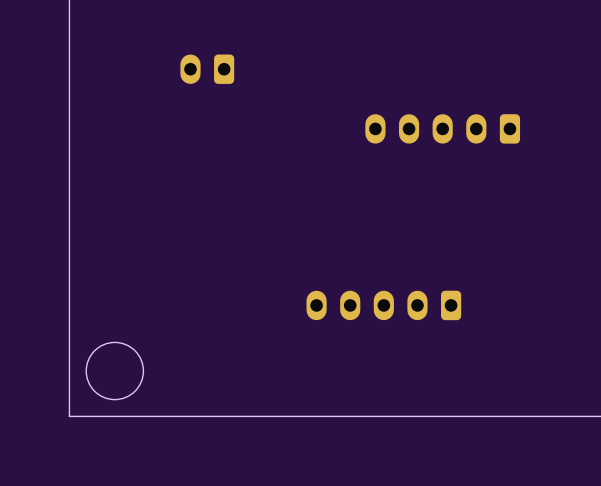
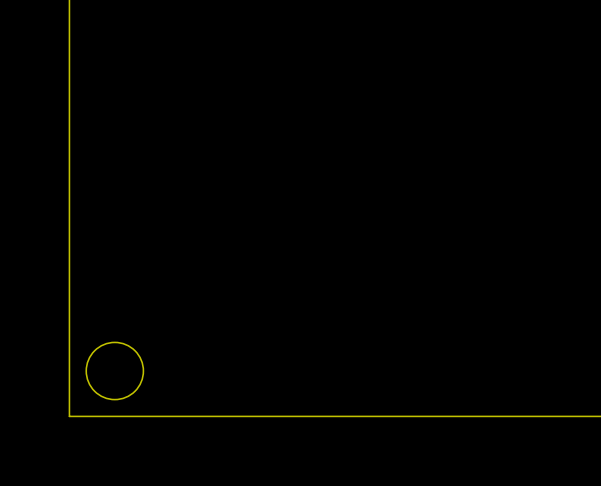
part: (207, 69) -> none
part: (442, 128) -> none
part: (383, 305) -> none

